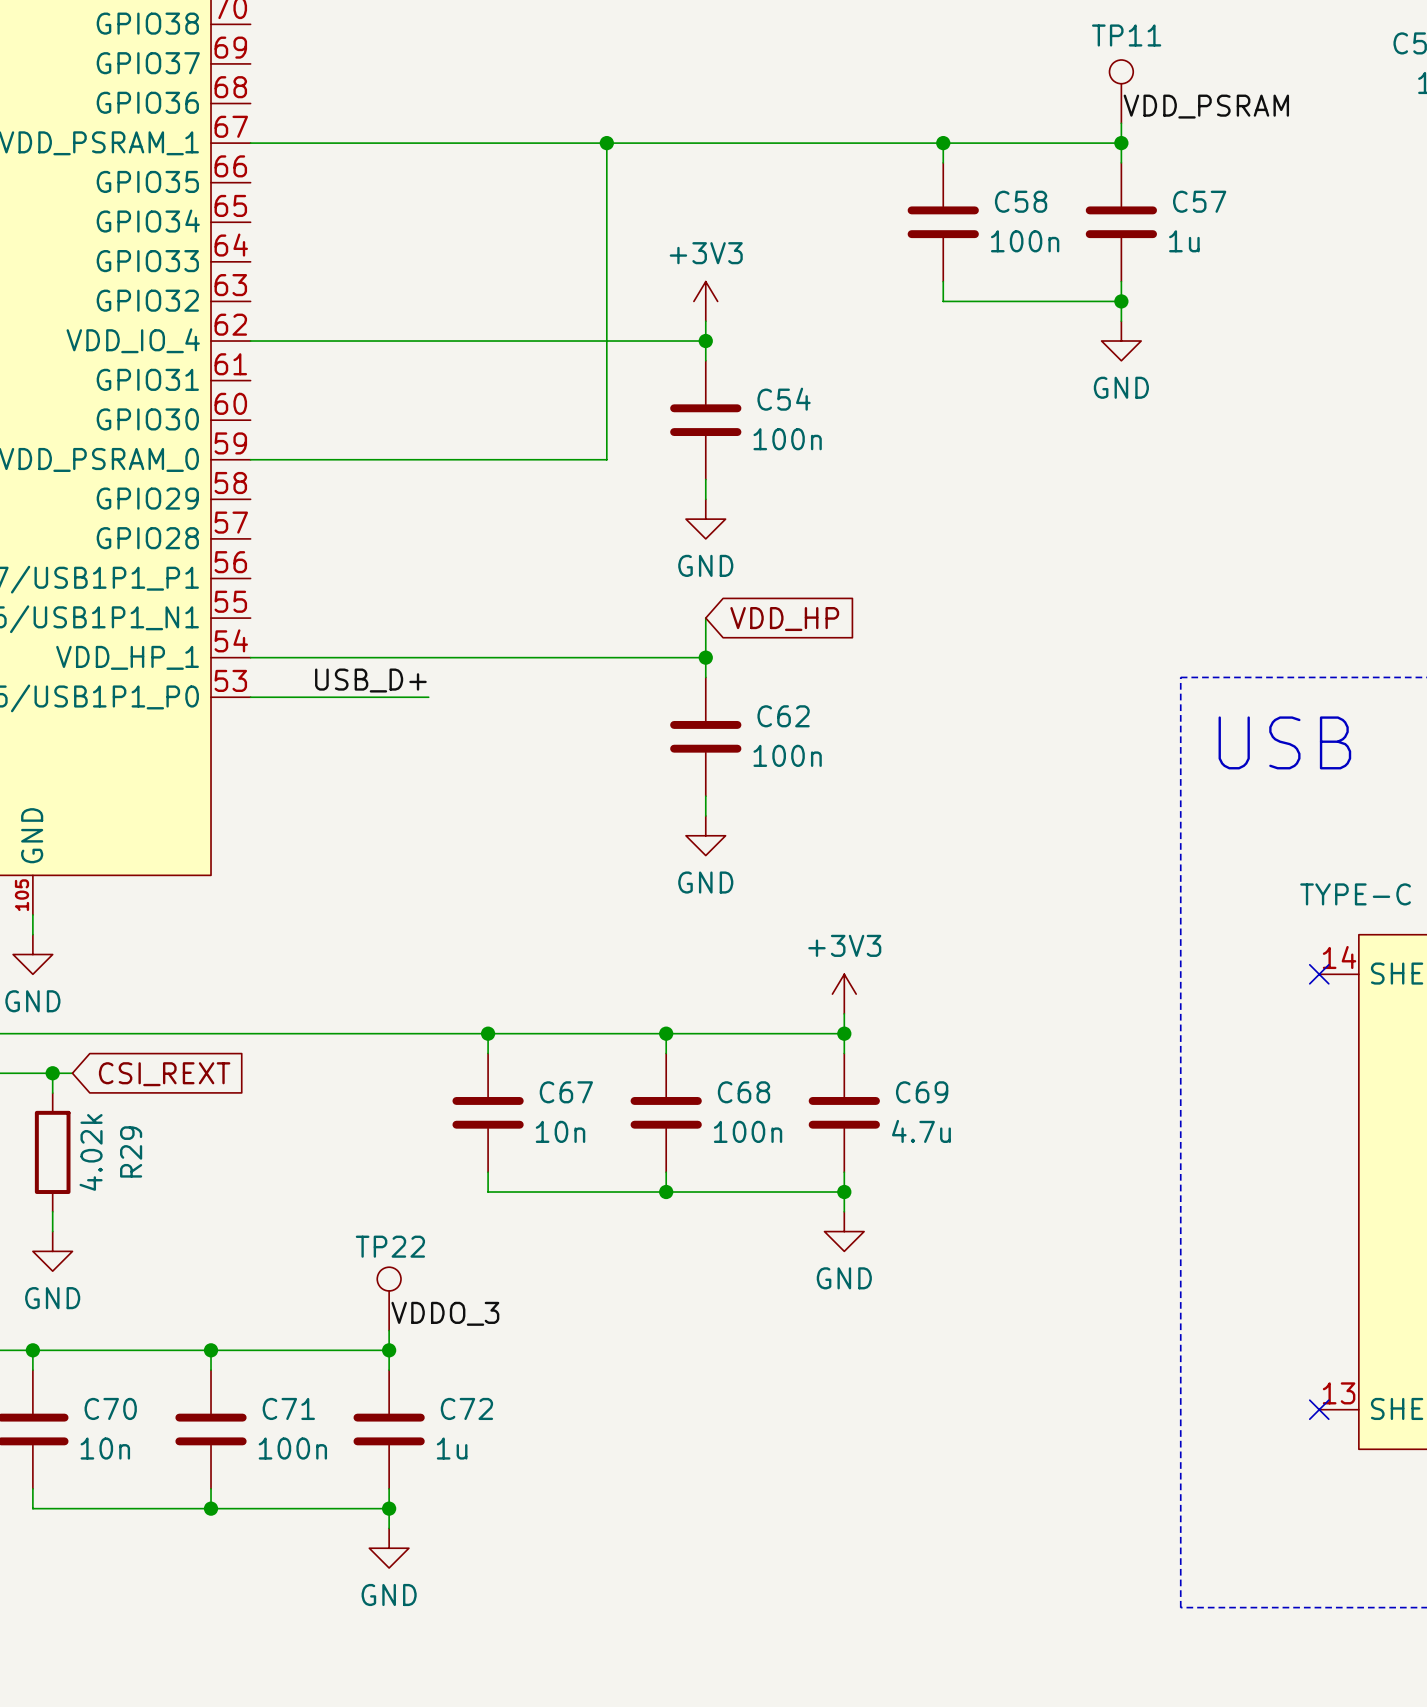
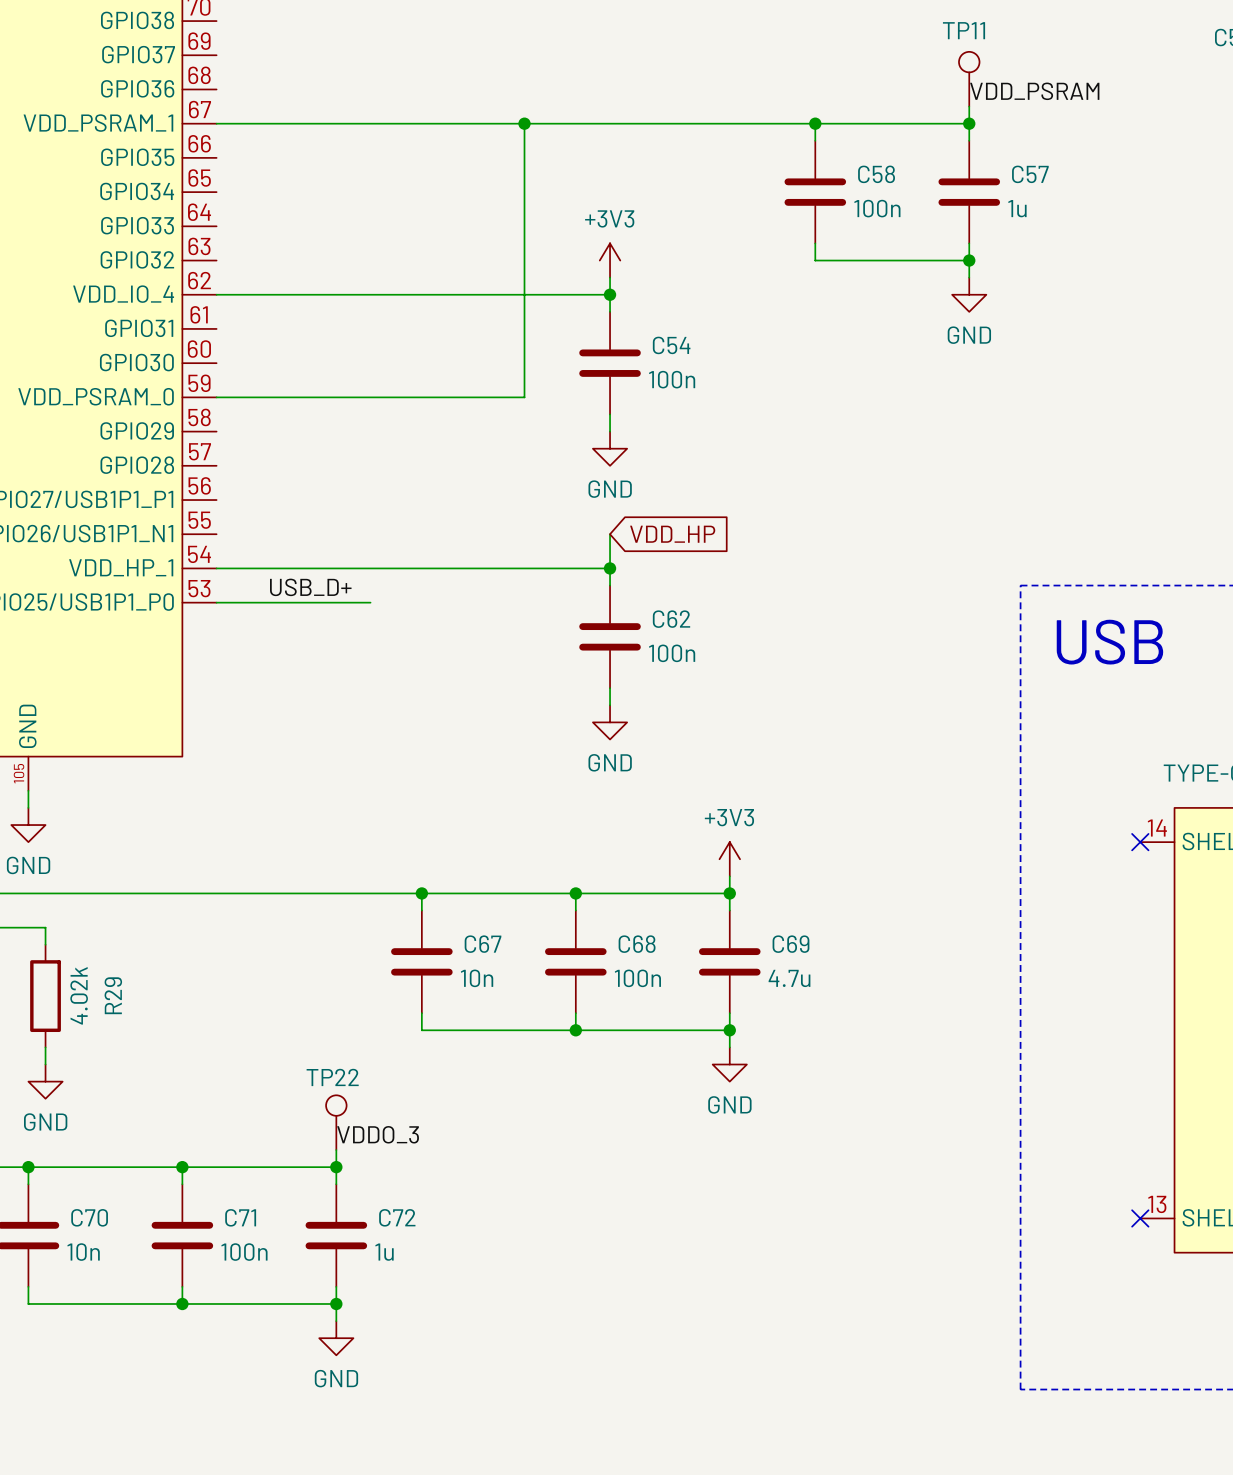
wire: (52, 1073) (72, 1073) -> none
junction: (52, 1073) -> none
global label: CSI_REXT (164, 1074) -> none

